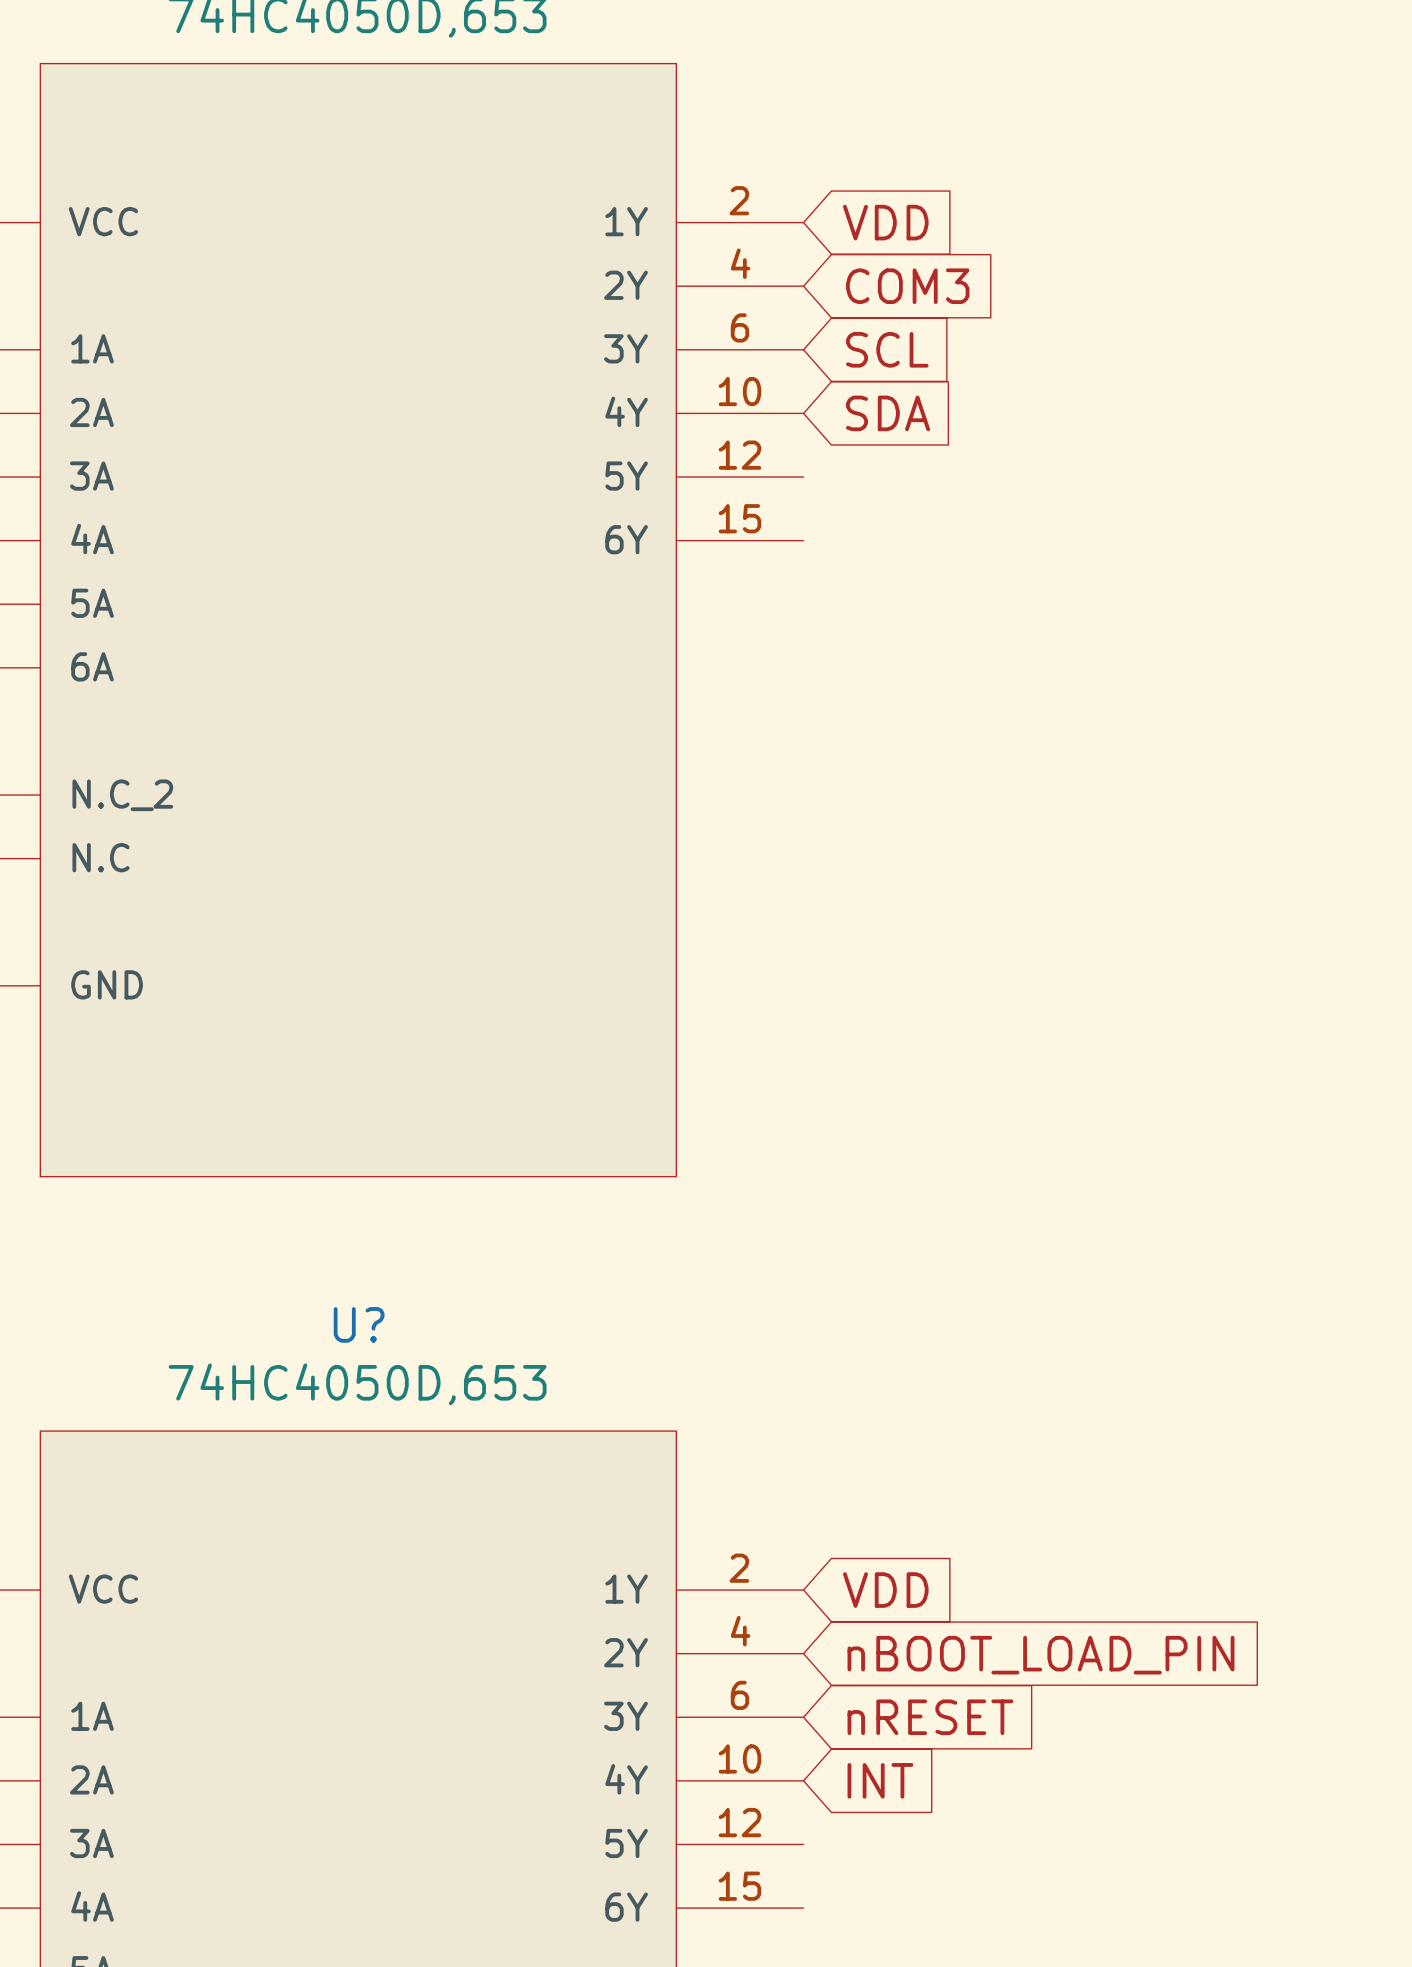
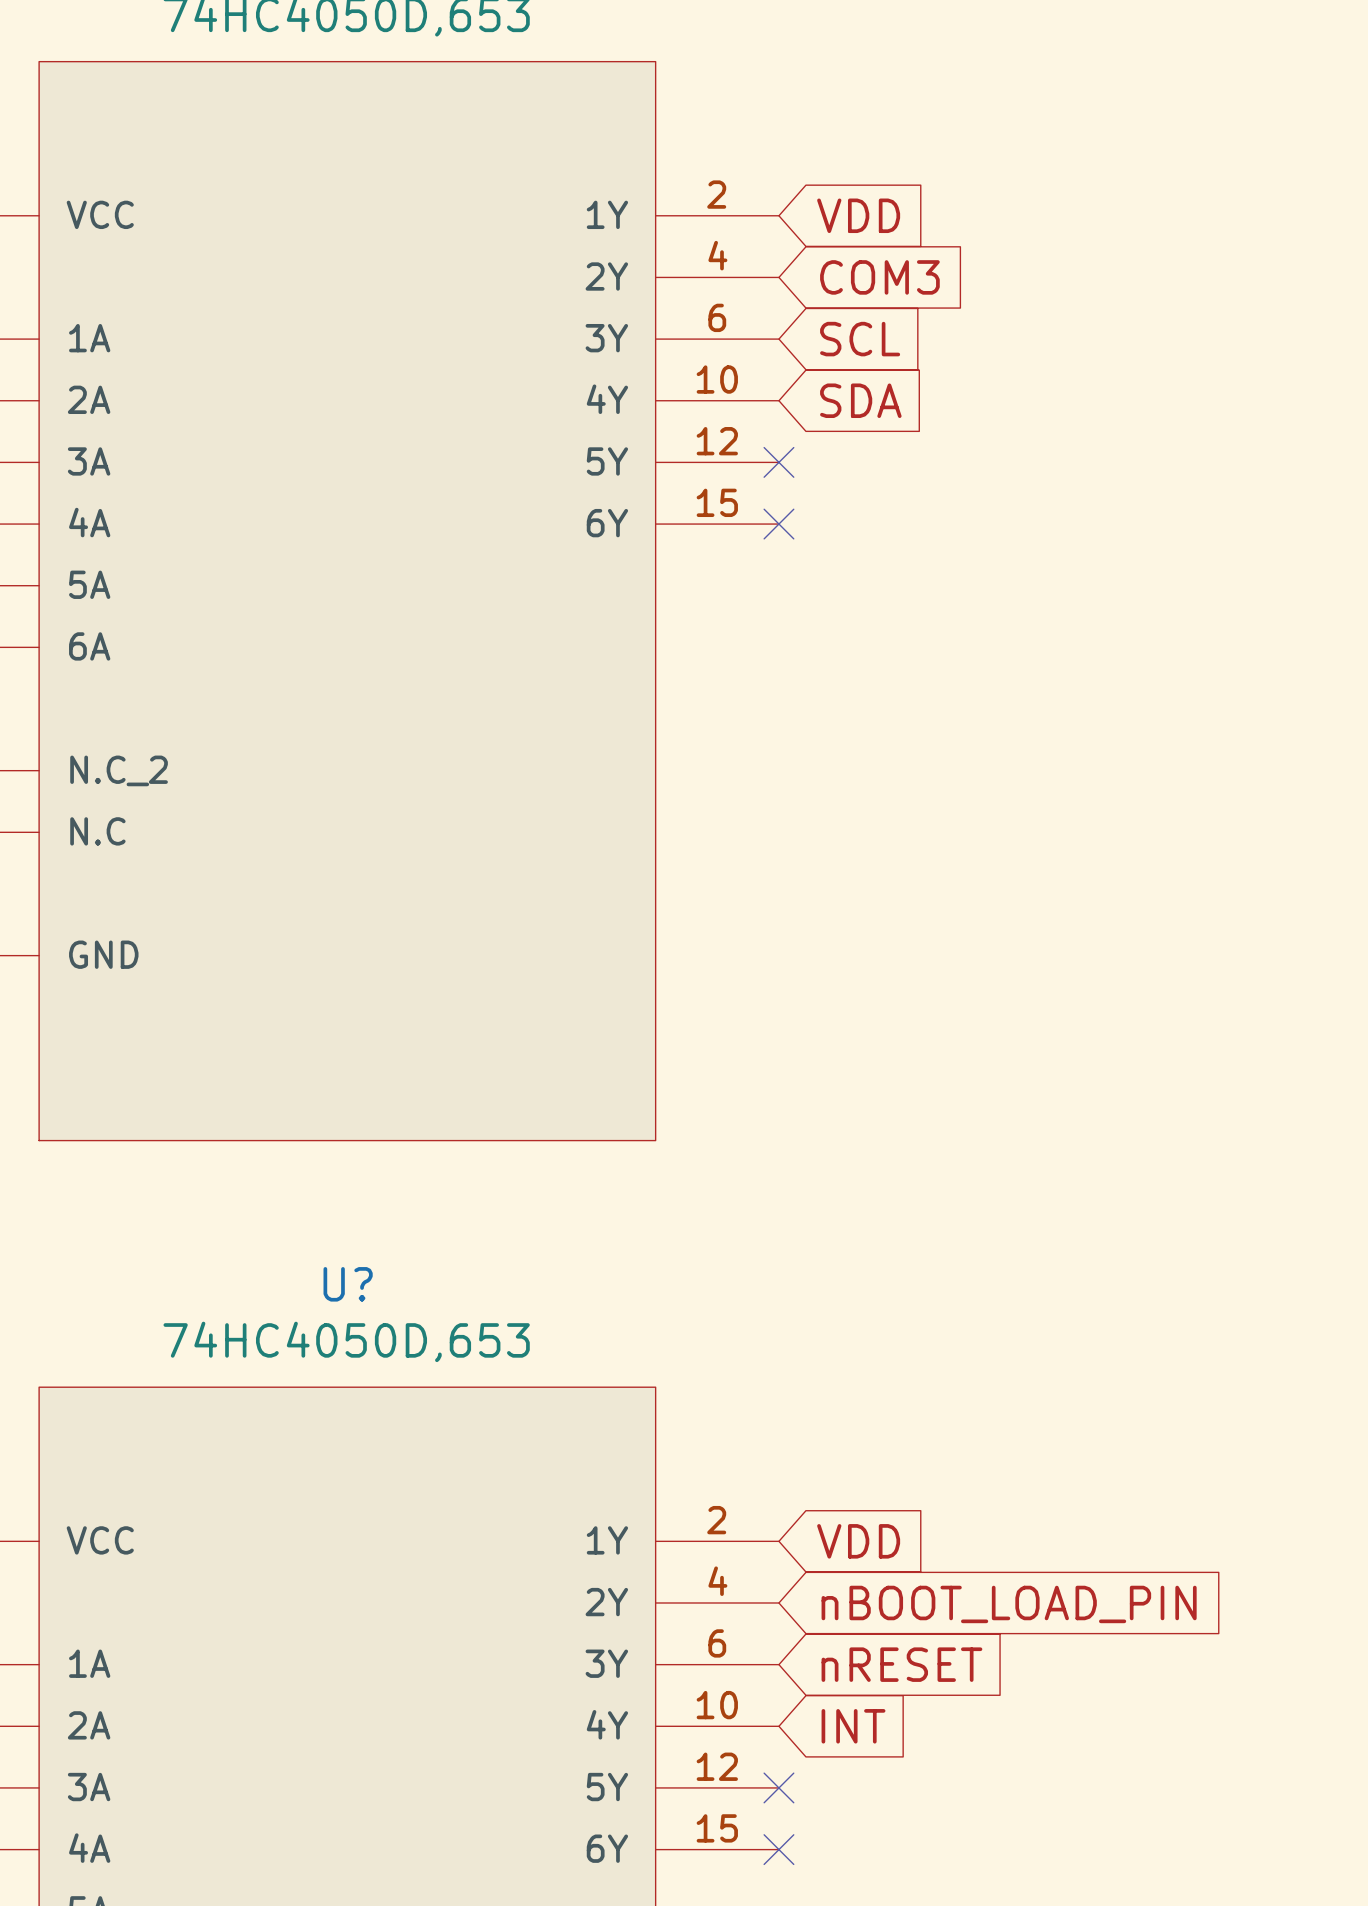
no-connect mark: none -> (778, 462)
no-connect mark: none -> (778, 524)
no-connect mark: none -> (778, 1787)
no-connect mark: none -> (778, 1849)

